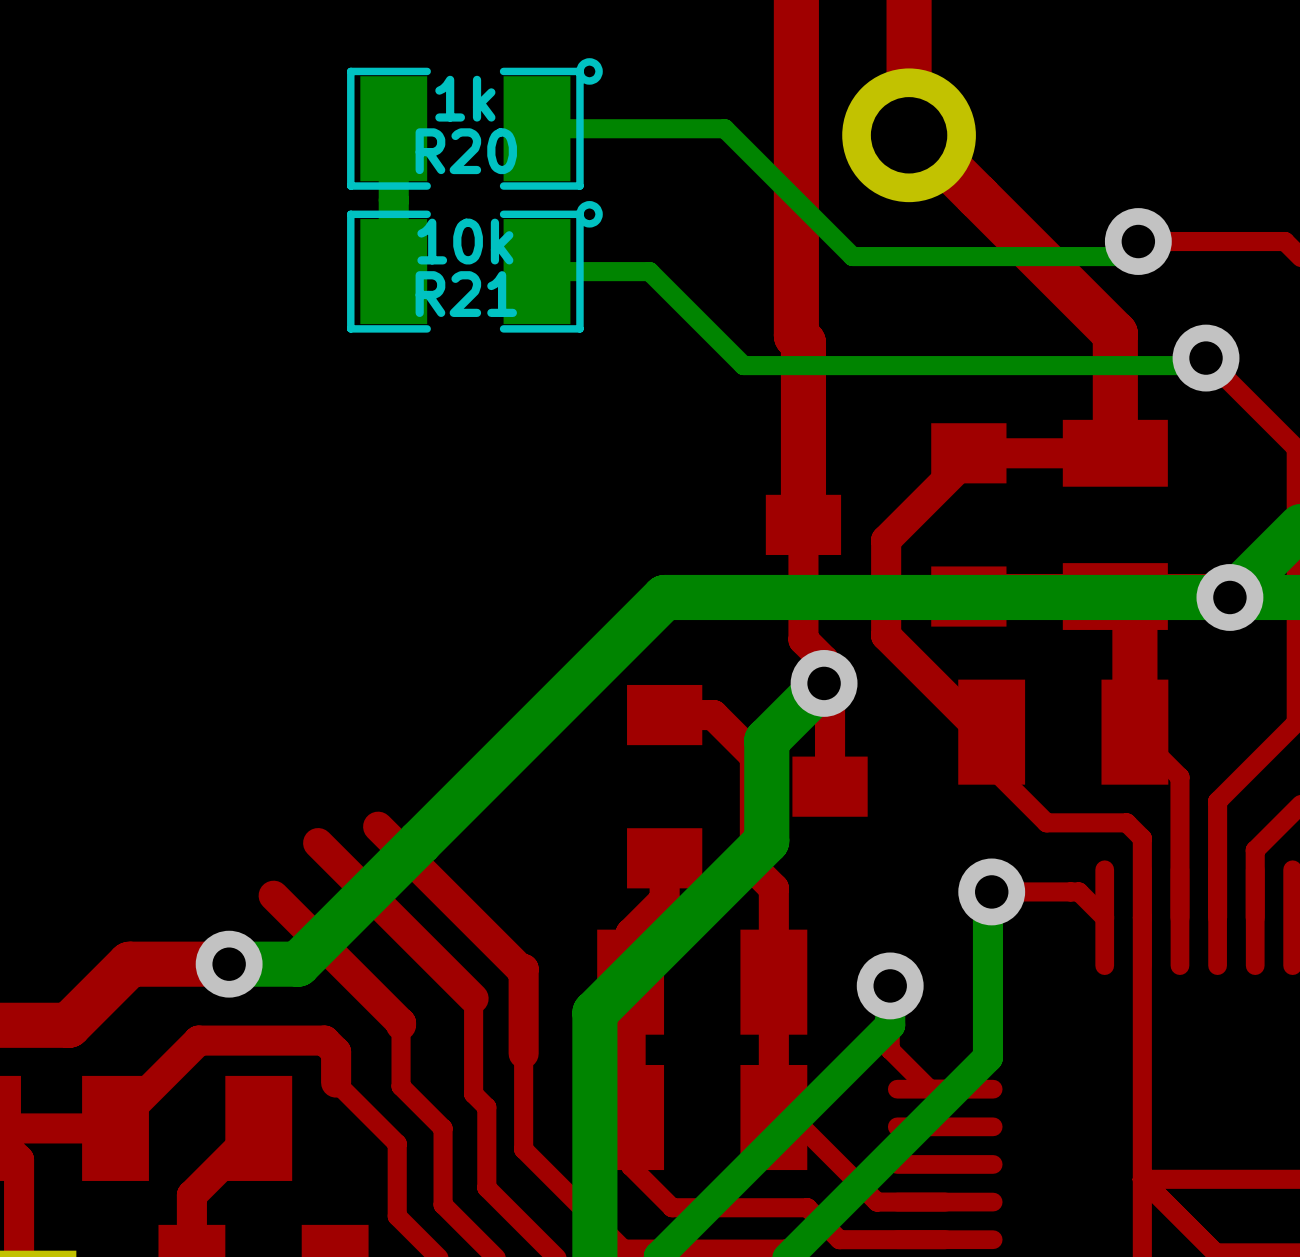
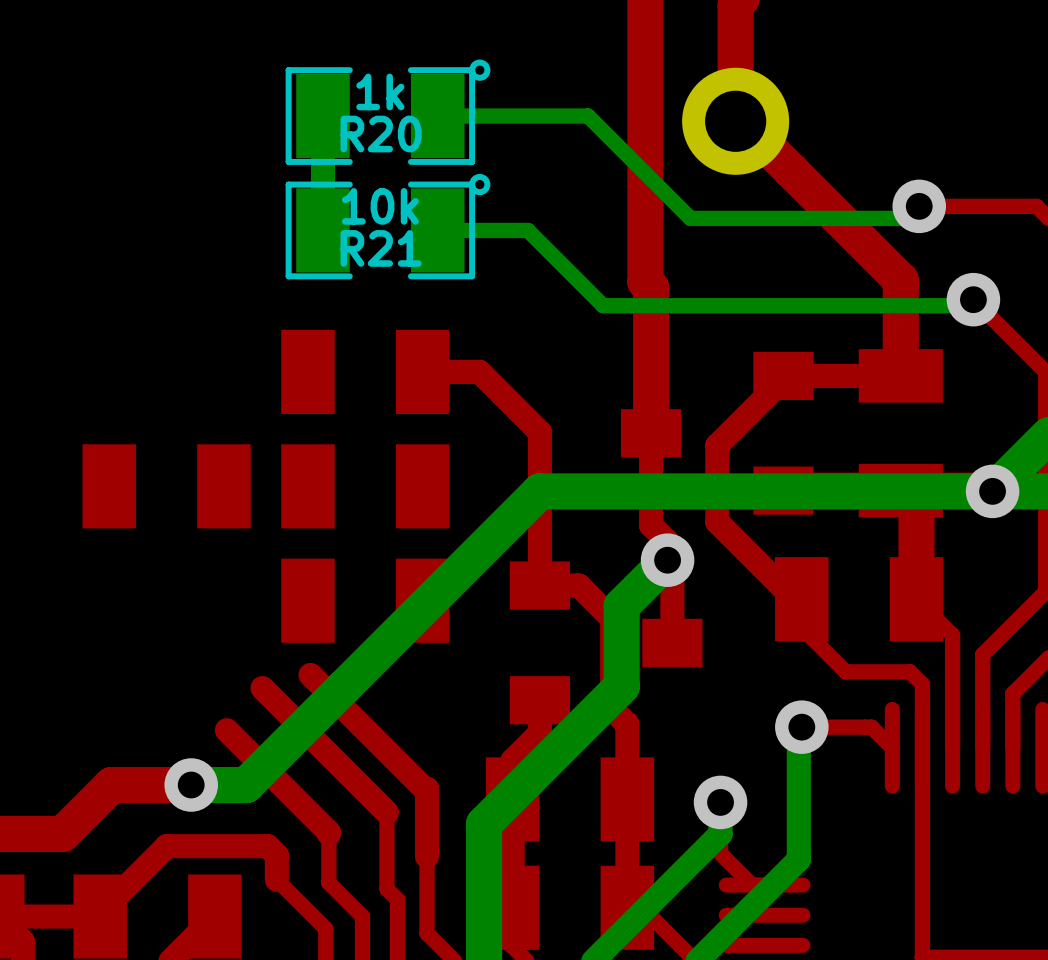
part: none -> (365, 371)
top track: none -> (422, 371) (479, 371) (539, 432) (539, 585)
part: none -> (166, 486)
part: none -> (365, 486)
part: none -> (365, 600)

